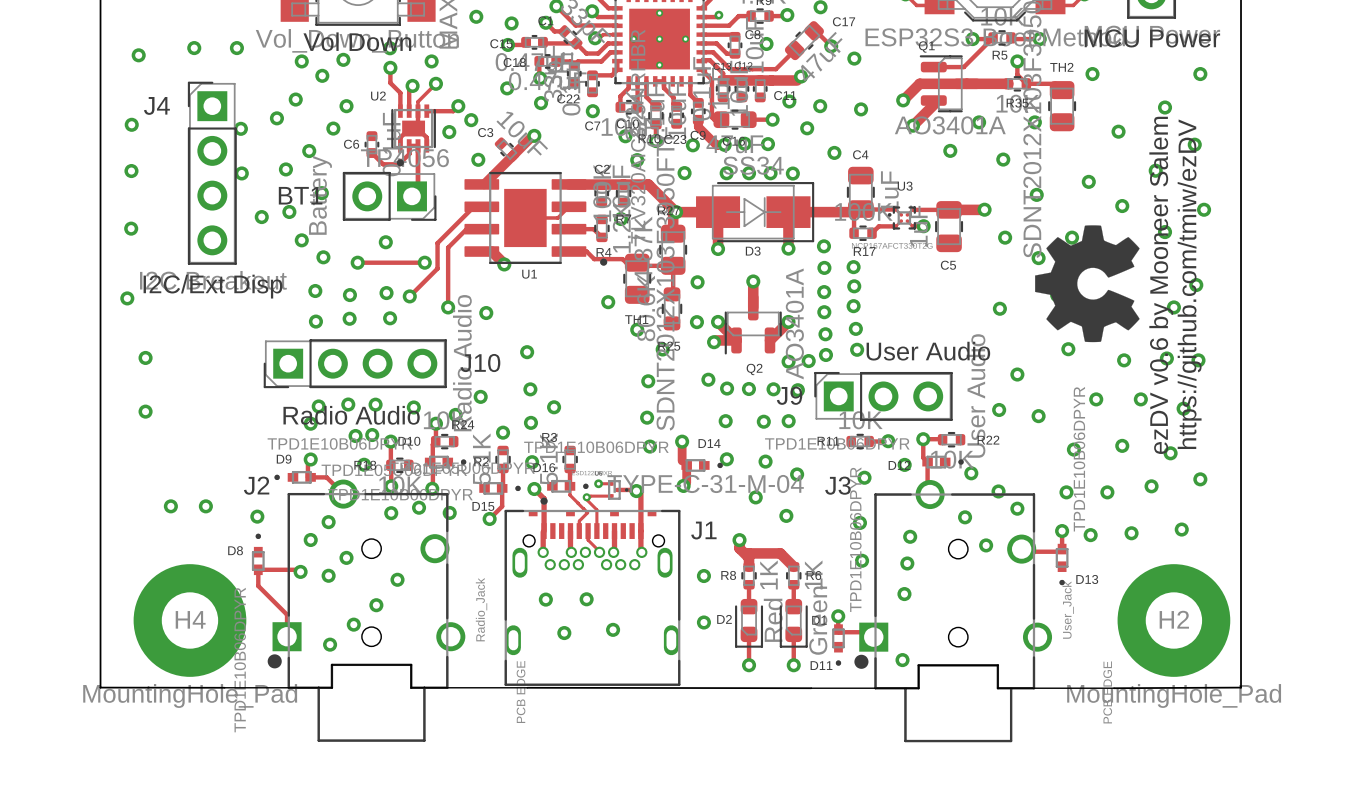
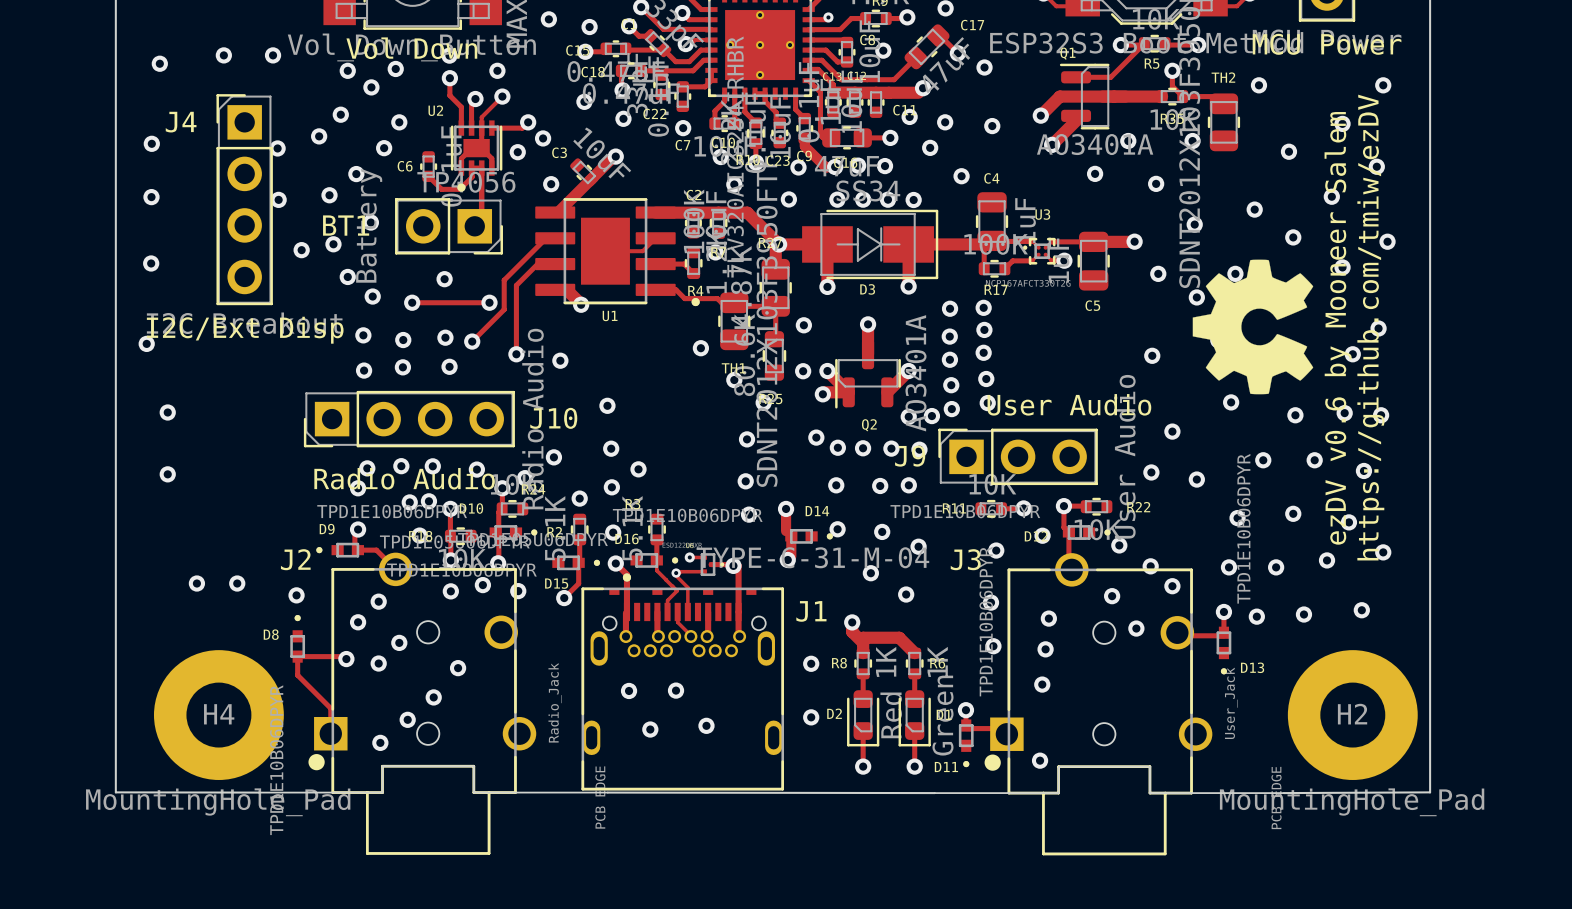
via: (823, 246) -> none

